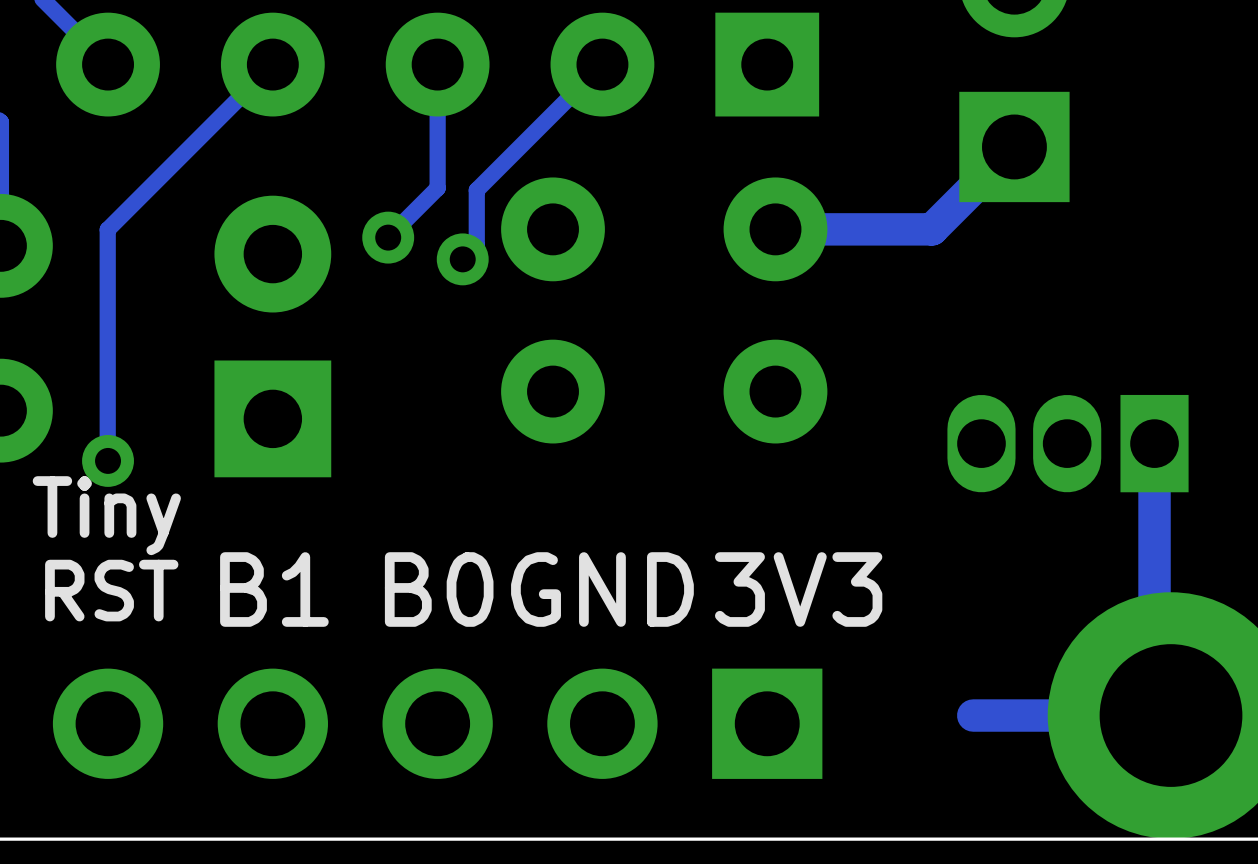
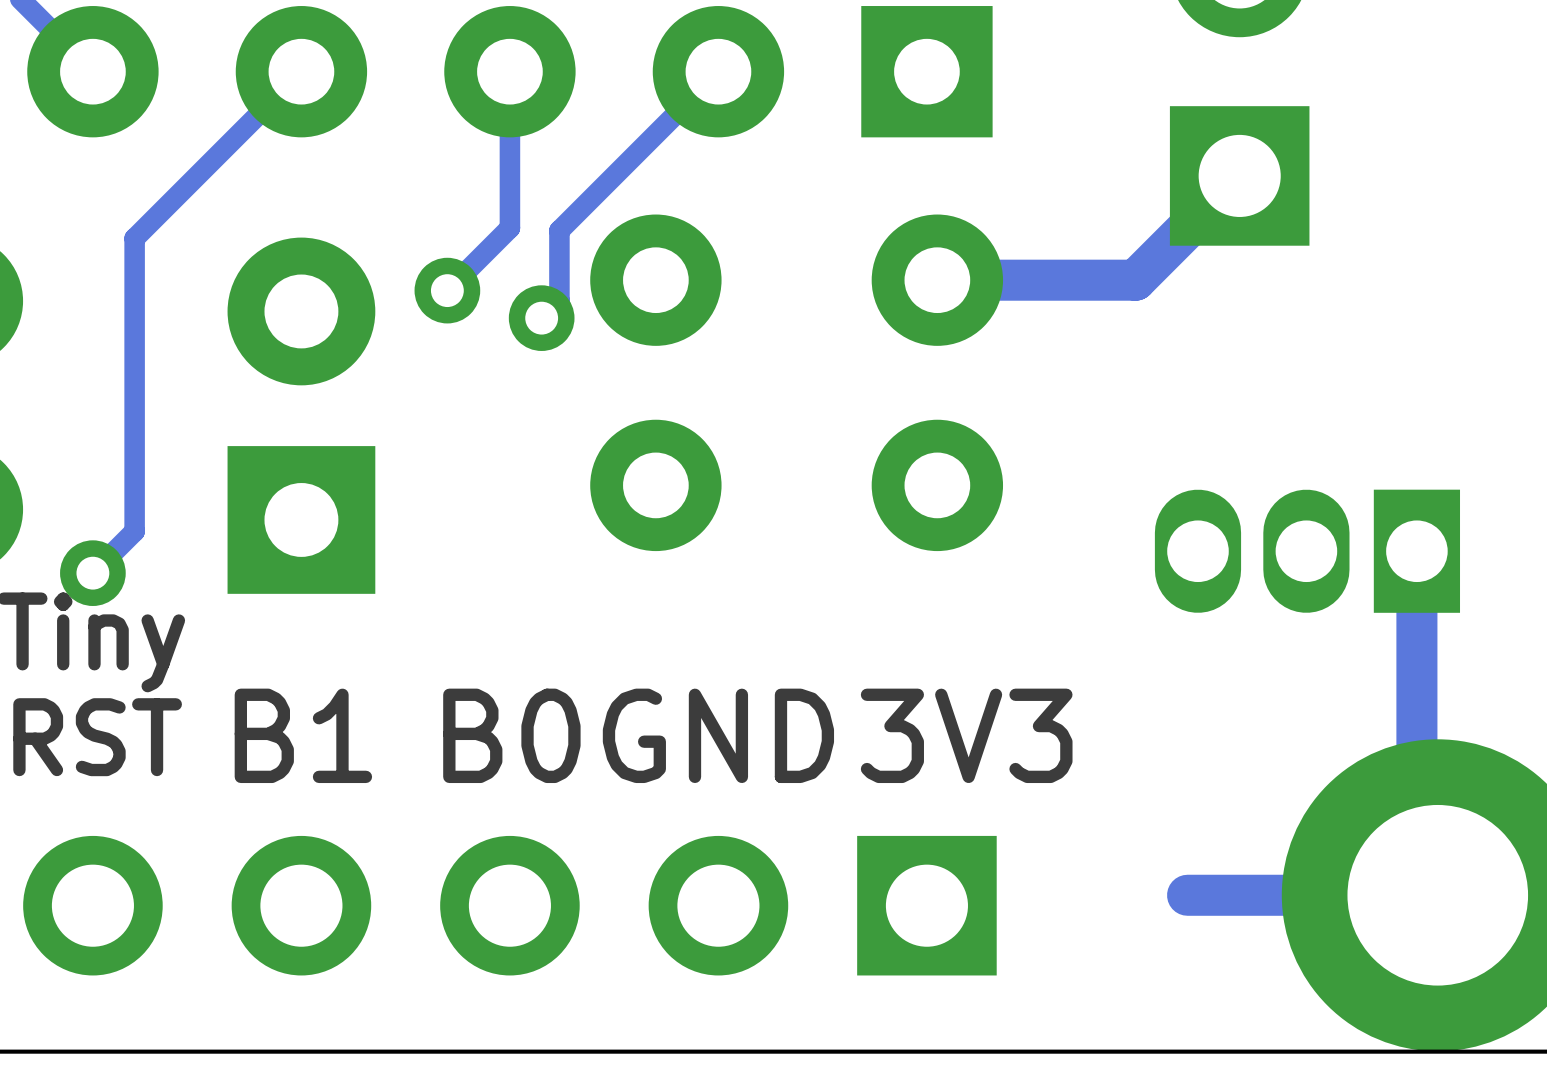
track: (141, 196) (107, 229) (107, 460) -> (134, 238) (134, 531) (92, 573)

